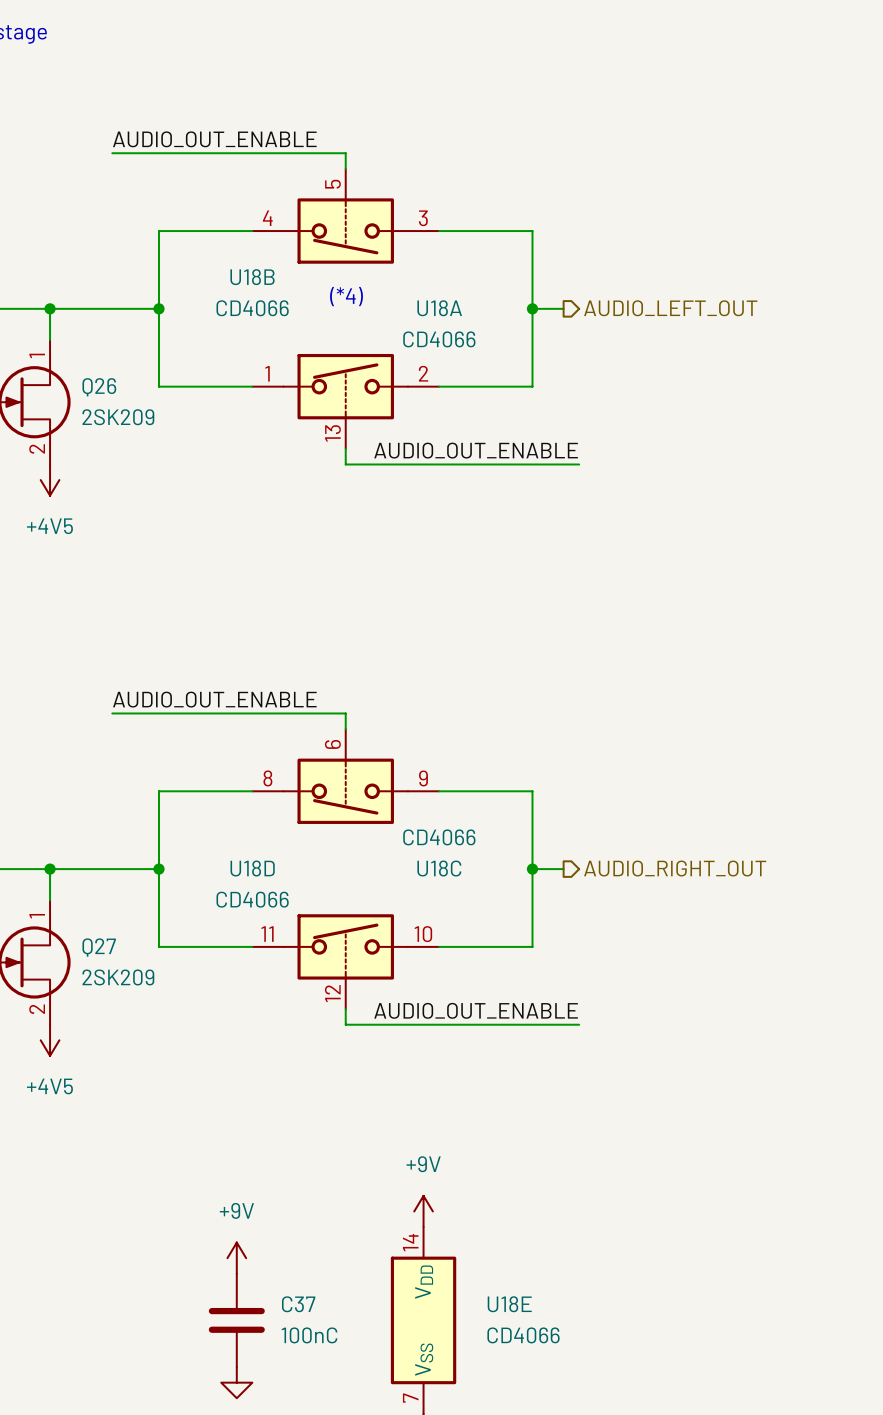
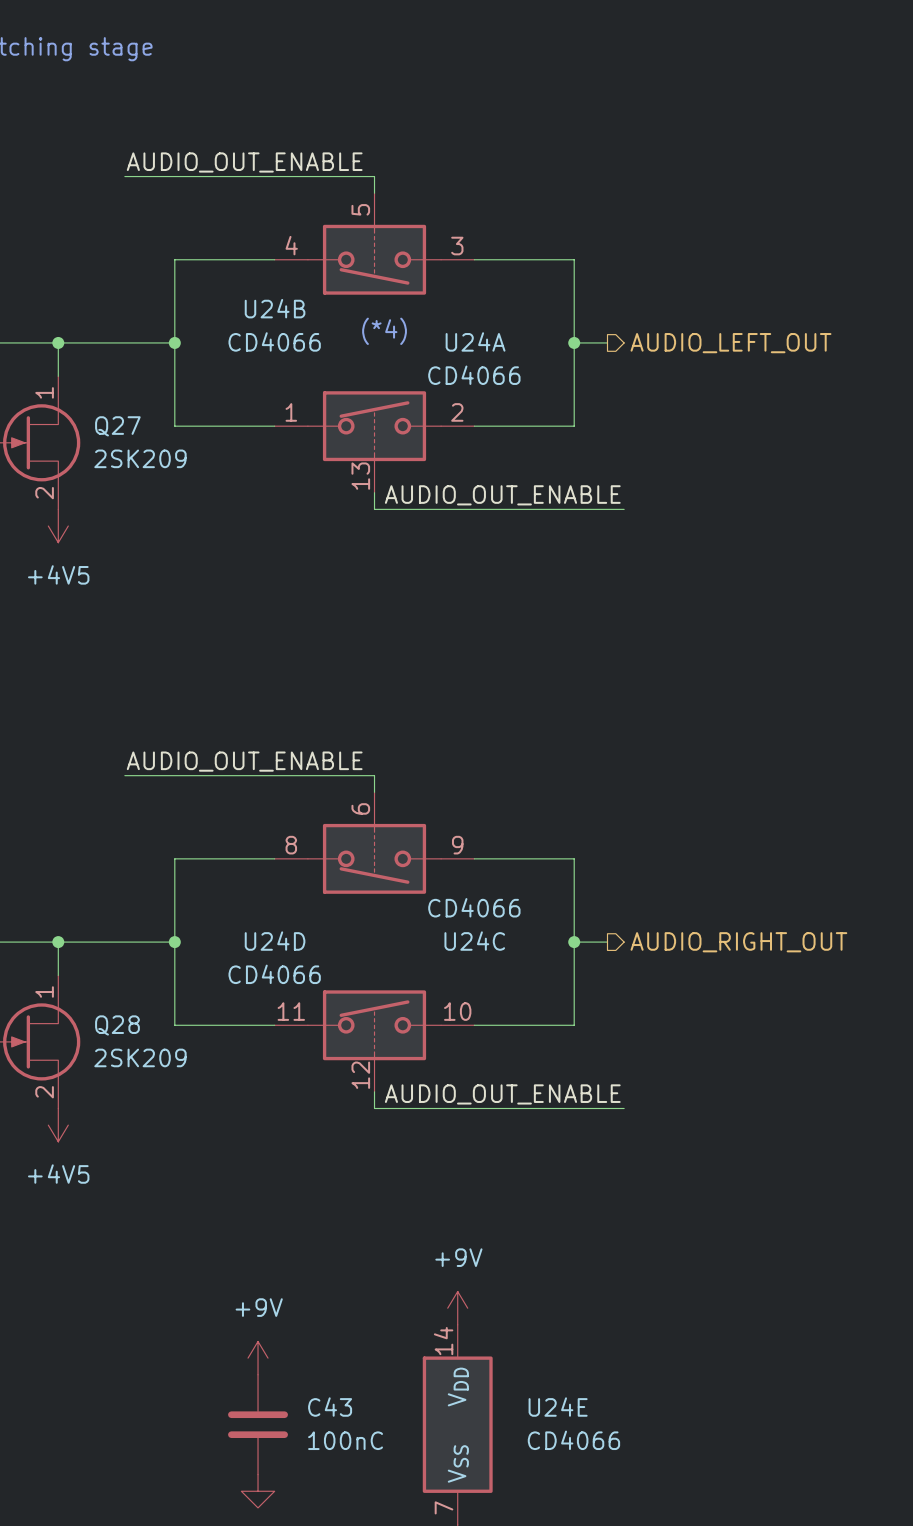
U18B name: U18B (252, 277) -> U24B (275, 308)
U18A name: U18A (439, 308) -> U24A (475, 341)
Q26 name: Q26 (99, 387) -> Q27 (117, 426)
U18D name: U18D (252, 868) -> U24D (275, 941)
U18C name: U18C (439, 868) -> U24C (474, 941)
Q27 name: Q27 (99, 947) -> Q28 (117, 1025)
C37 name: C37 (298, 1304) -> C43 (330, 1407)
U18E name: U18E (509, 1304) -> U24E (558, 1407)

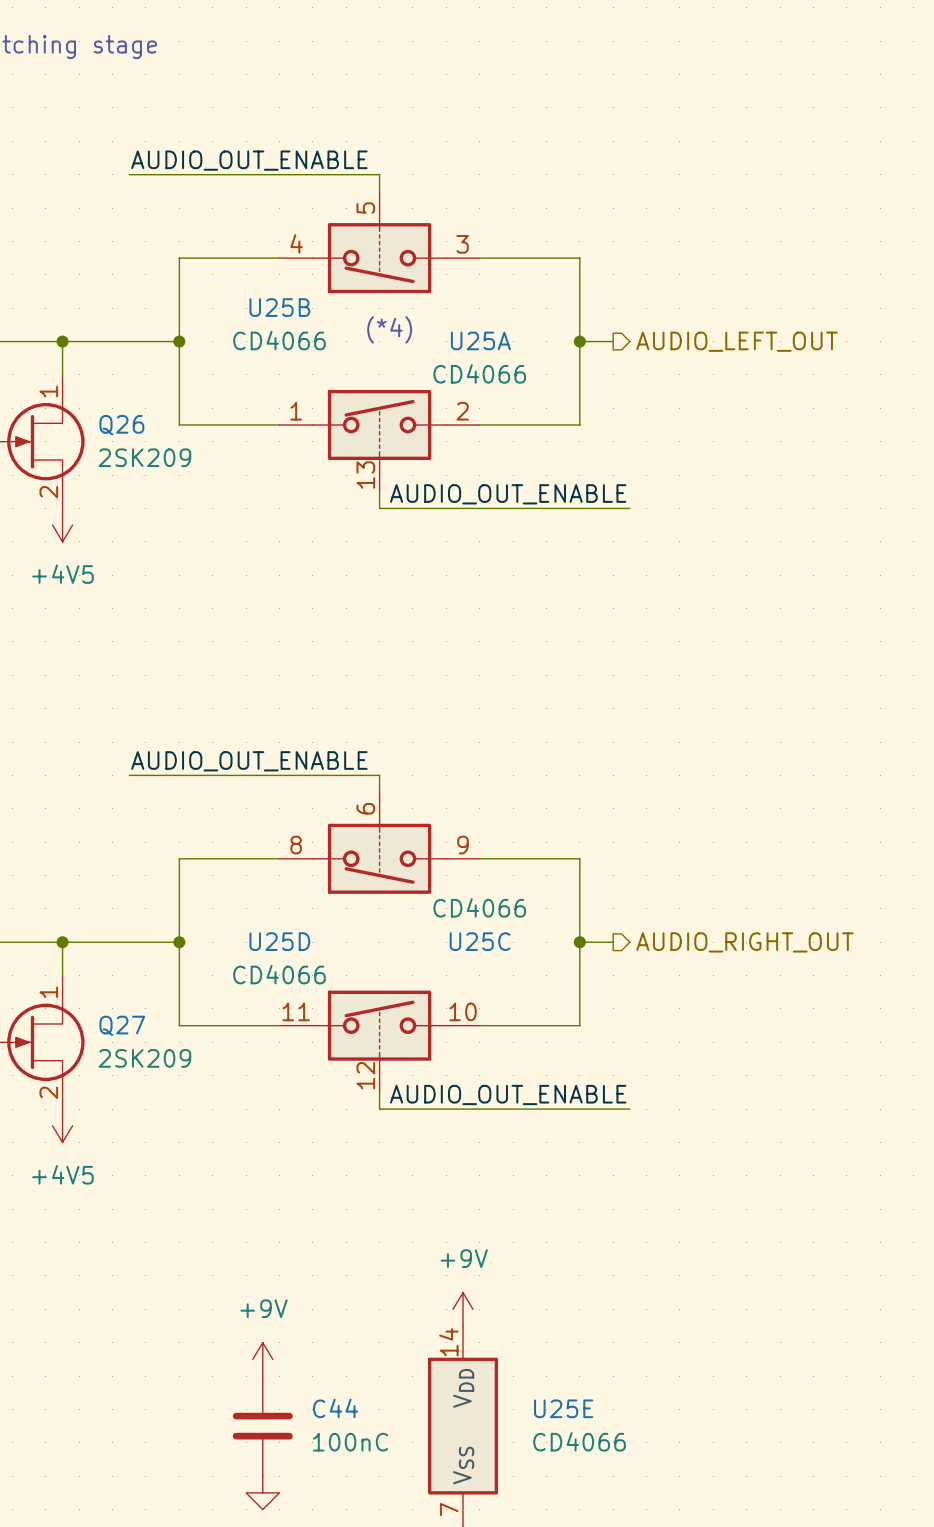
U24B name: U24B (275, 308) -> U25B (279, 307)
U24A name: U24A (475, 341) -> U25A (480, 340)
Q27 name: Q27 (117, 426) -> Q26 (121, 425)
U24D name: U24D (275, 941) -> U25D (279, 941)
U24C name: U24C (474, 941) -> U25C (480, 941)
Q28 name: Q28 (117, 1025) -> Q27 (122, 1025)
C43 name: C43 (330, 1407) -> C44 (335, 1408)
U24E name: U24E (558, 1407) -> U25E (563, 1408)

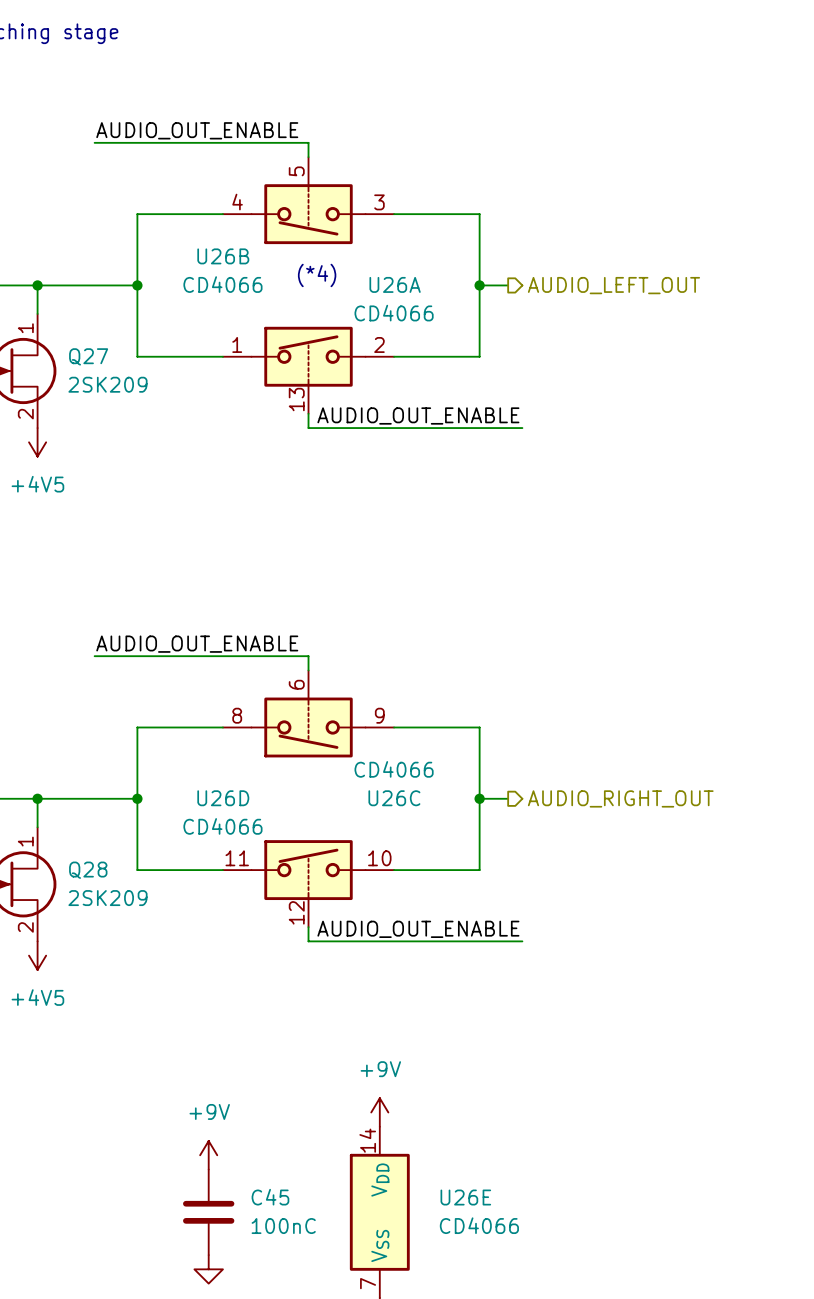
U25B name: U25B (279, 307) -> U26B (223, 256)
U25A name: U25A (480, 340) -> U26A (395, 284)
Q26 name: Q26 (121, 425) -> Q27 (88, 356)
U25D name: U25D (279, 941) -> U26D (223, 798)
U25C name: U25C (480, 941) -> U26C (394, 798)
Q27 name: Q27 (122, 1025) -> Q28 (88, 870)
C44 name: C44 (335, 1408) -> C45 (270, 1197)
U25E name: U25E (563, 1408) -> U26E (465, 1197)

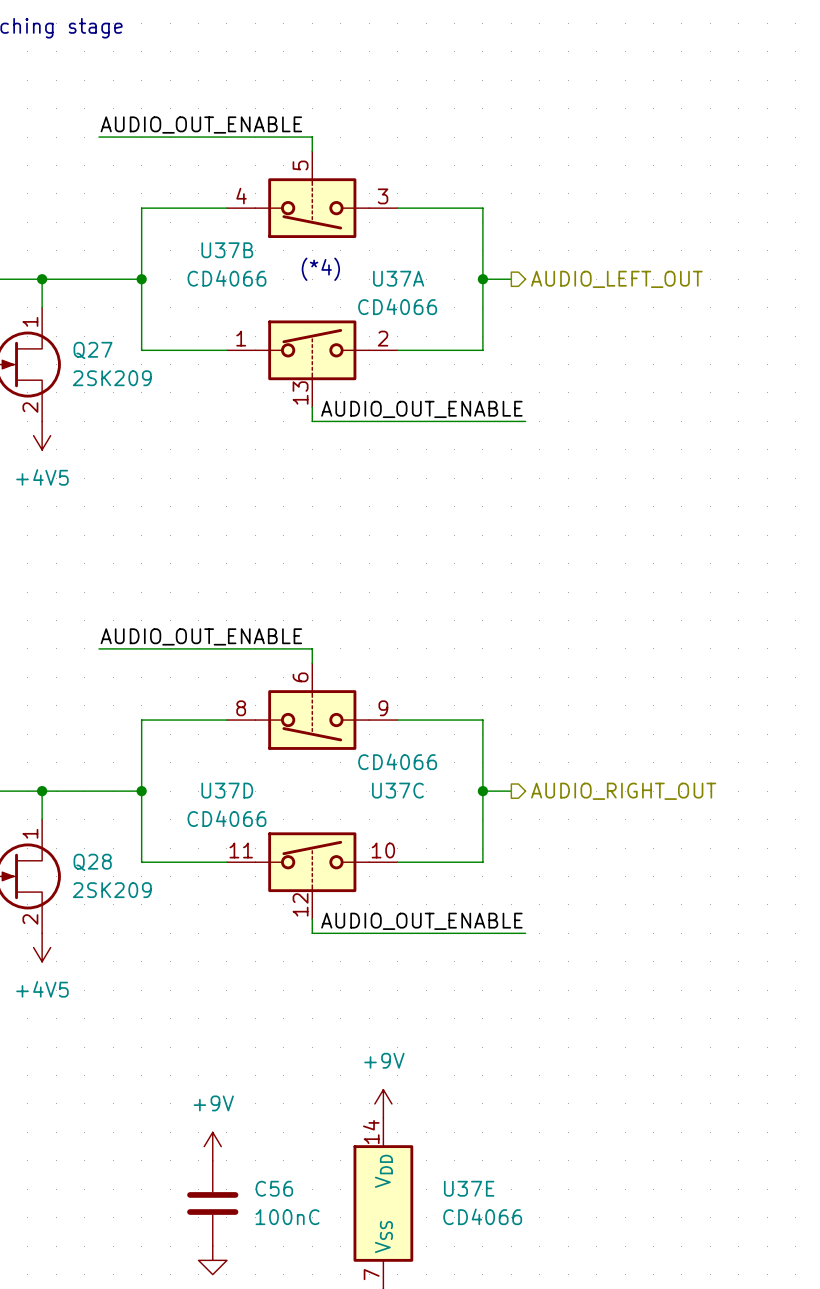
U26B name: U26B (223, 256) -> U37B (227, 250)
U26A name: U26A (395, 284) -> U37A (398, 278)
U26D name: U26D (223, 798) -> U37D (227, 790)
U26C name: U26C (394, 798) -> U37C (397, 790)
C45 name: C45 (270, 1197) -> C56 (274, 1188)
U26E name: U26E (465, 1197) -> U37E (469, 1188)

